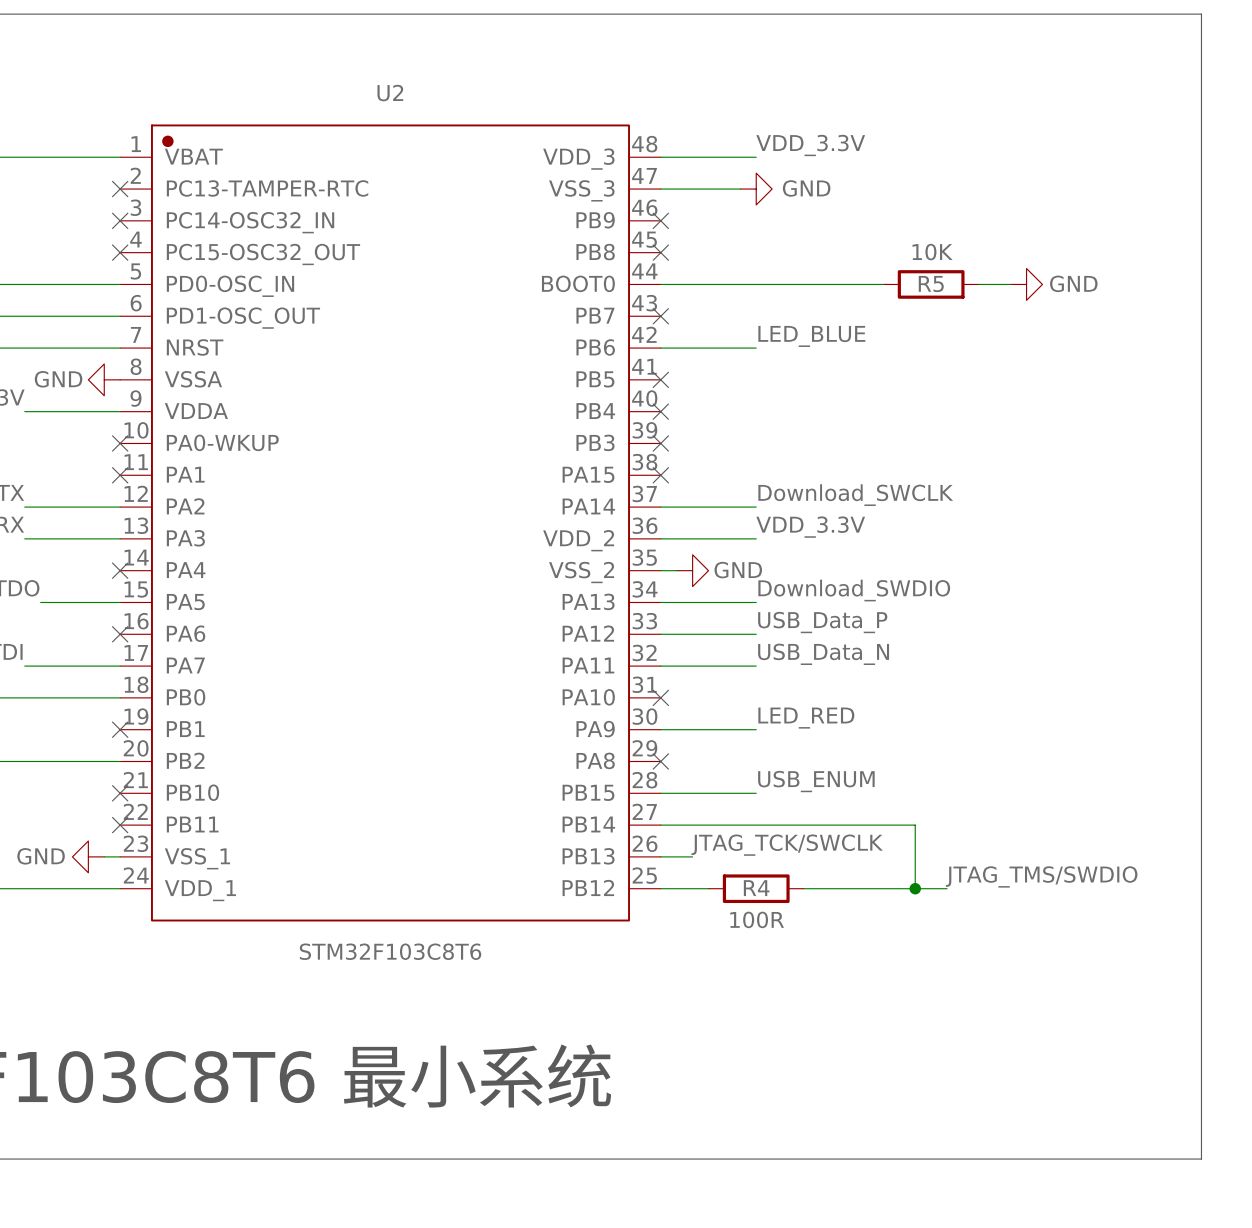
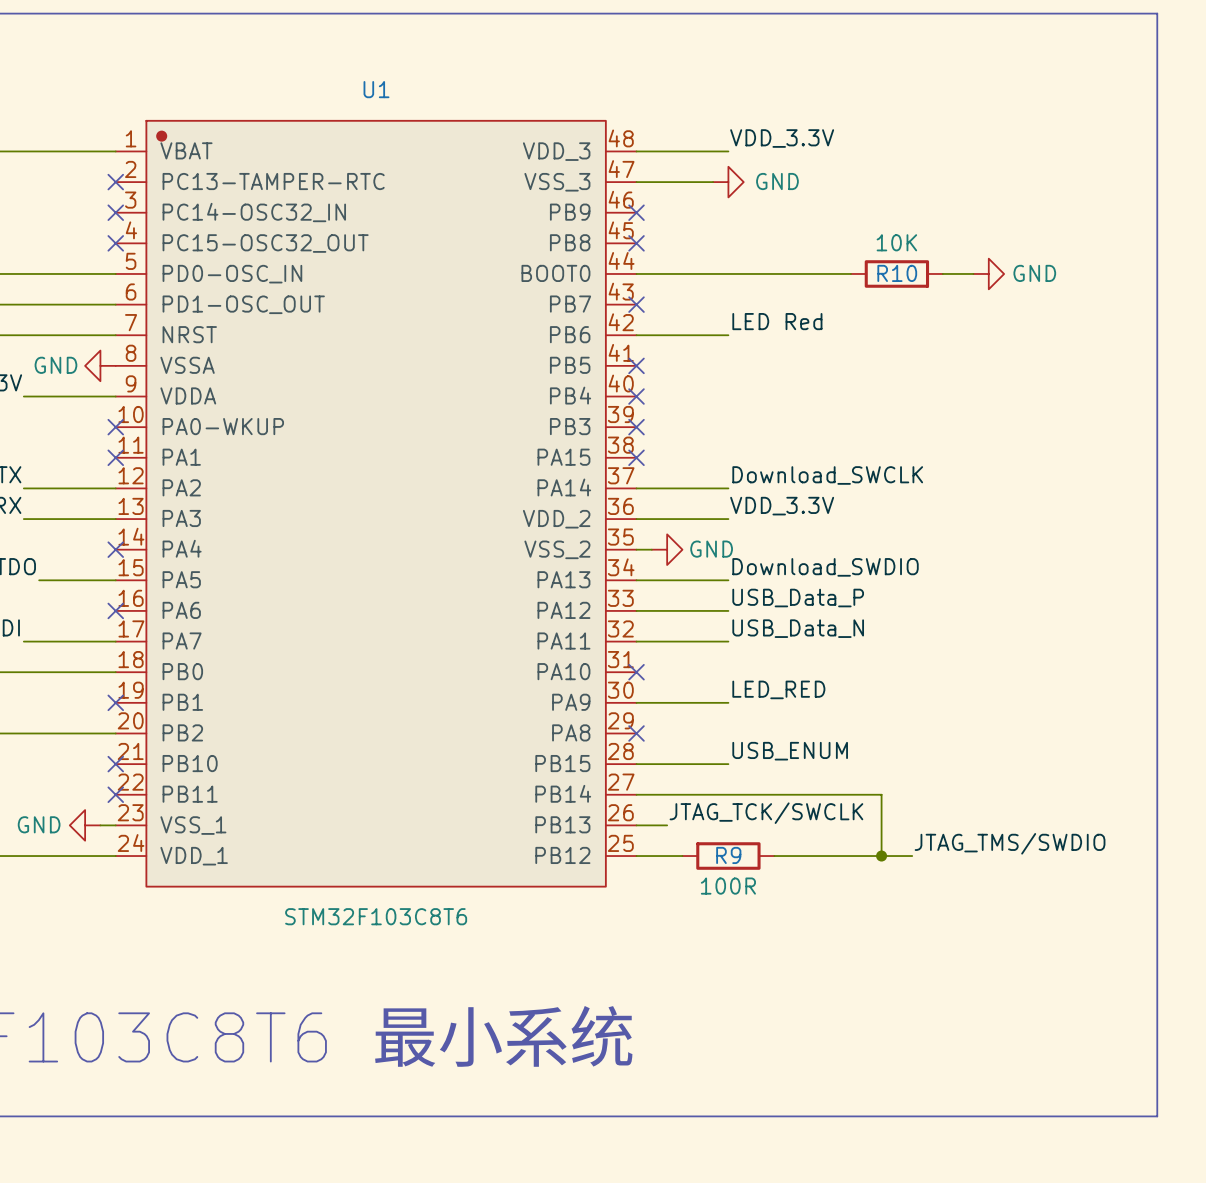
U2 name: U2 (390, 93) -> U1 (376, 89)
R5 name: R5 (931, 284) -> R10 (897, 273)
label: LED_BLUE (811, 336) -> LED Red (777, 321)
R4 name: R4 (756, 888) -> R9 (728, 855)

